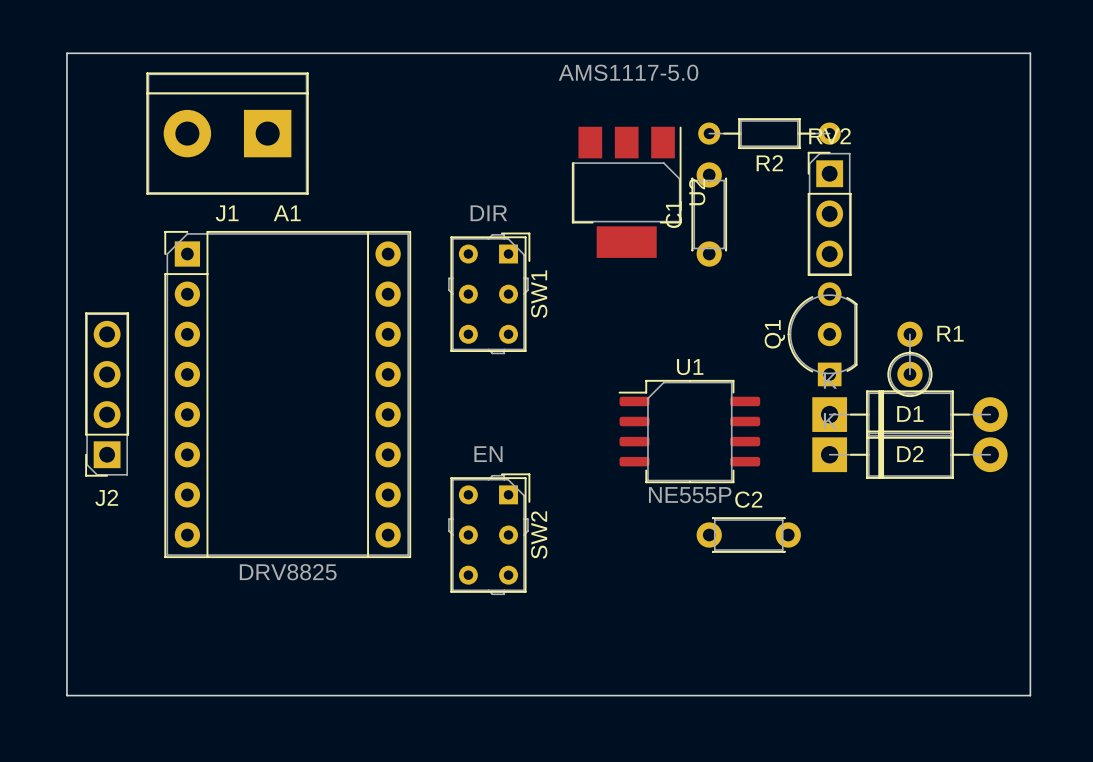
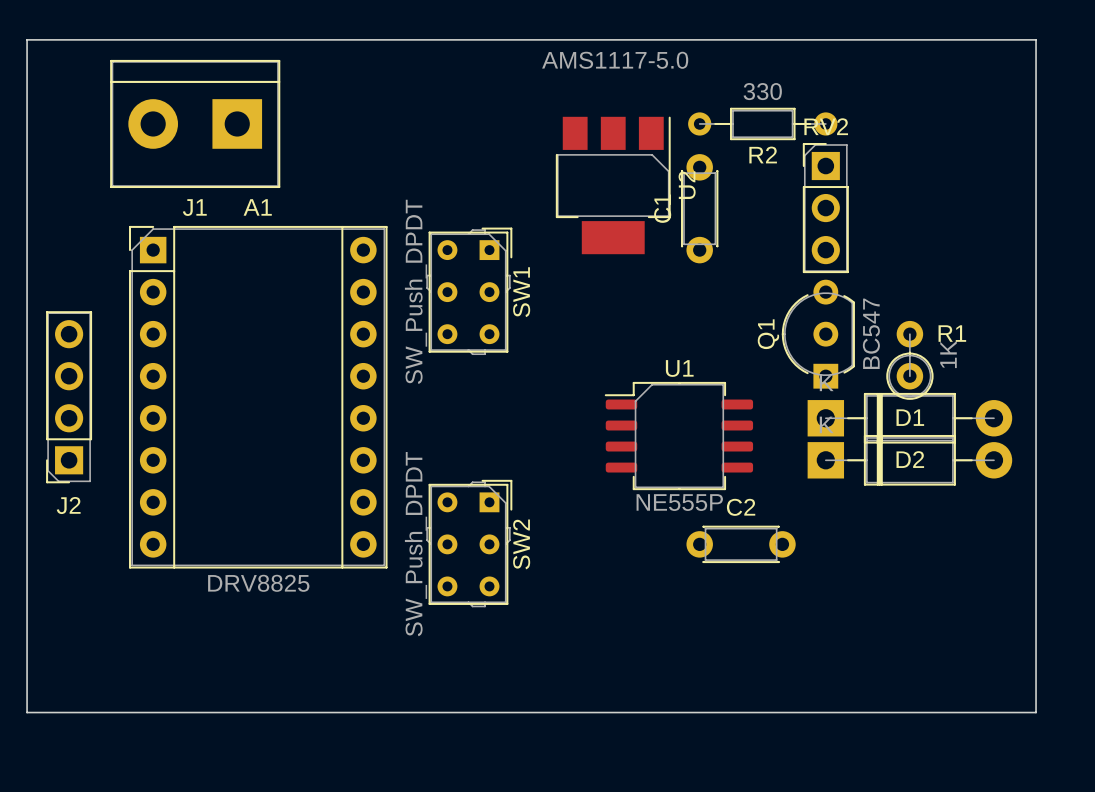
R2 value: none -> 330 (762, 91)
SW1 value: DIR (488, 213) -> SW_Push_DPDT (416, 291)
Q1 value: none -> BC547 (871, 333)
R1 value: none -> 1K (948, 354)
SW2 value: EN (488, 454) -> SW_Push_DPDT (416, 544)

